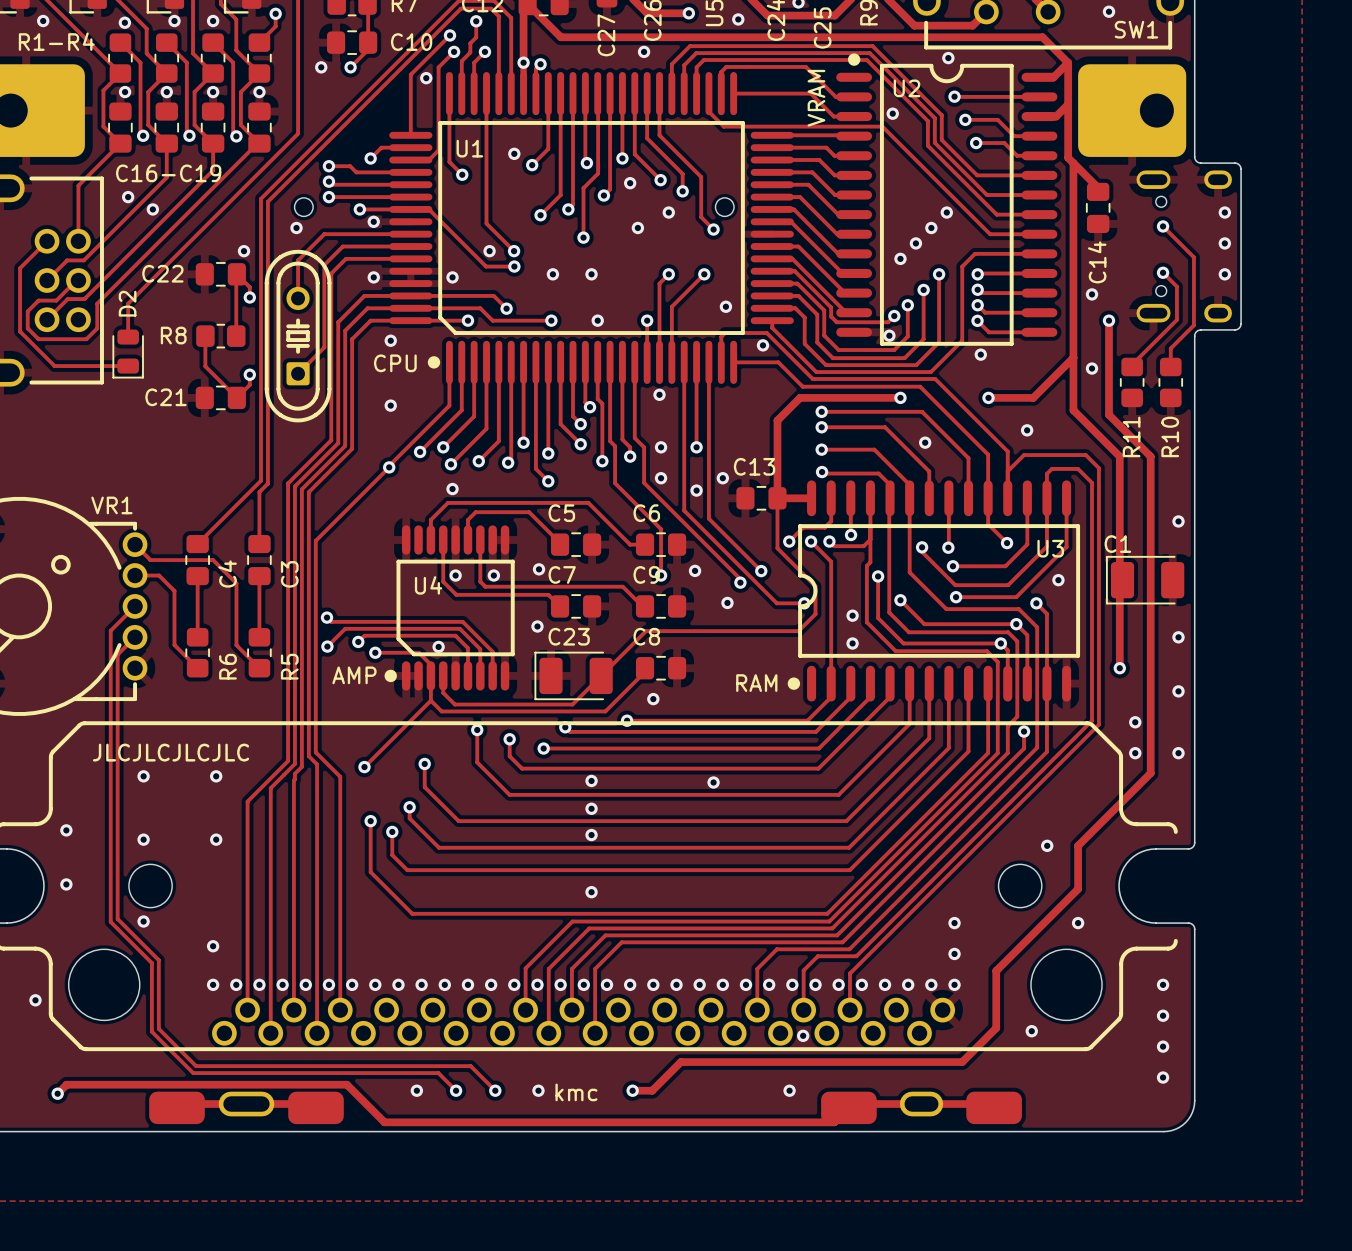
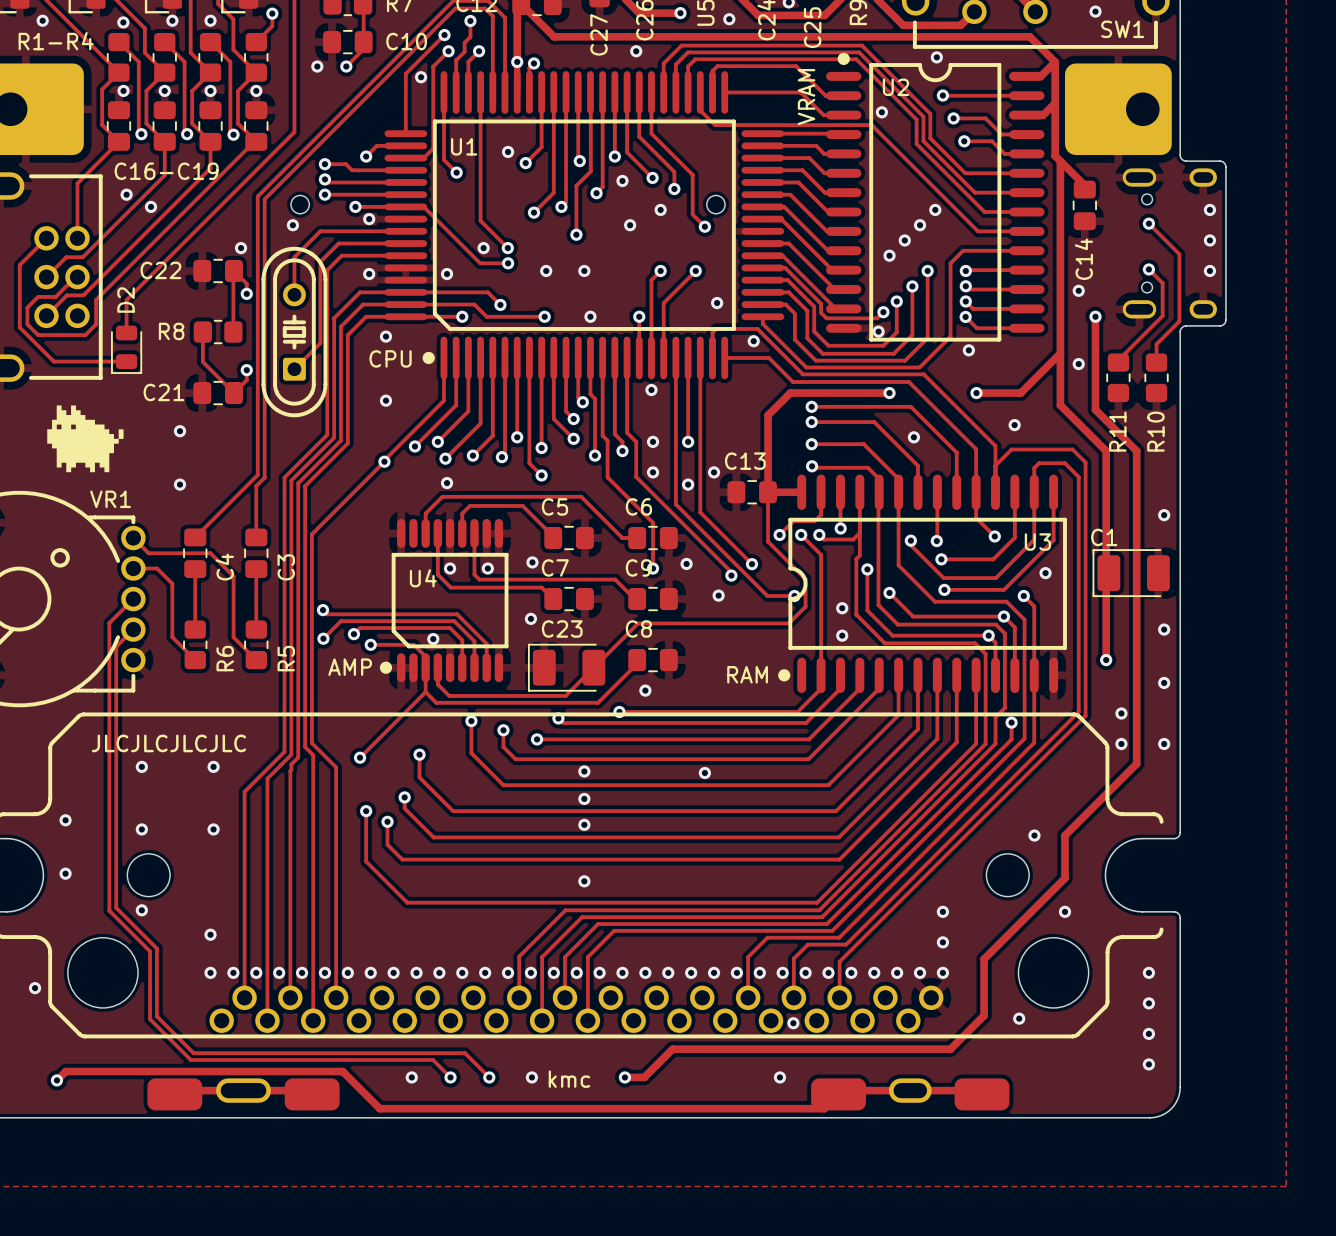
drawing: none -> [47, 405, 124, 473]
via: none -> (180, 431)
via: none -> (180, 484)

